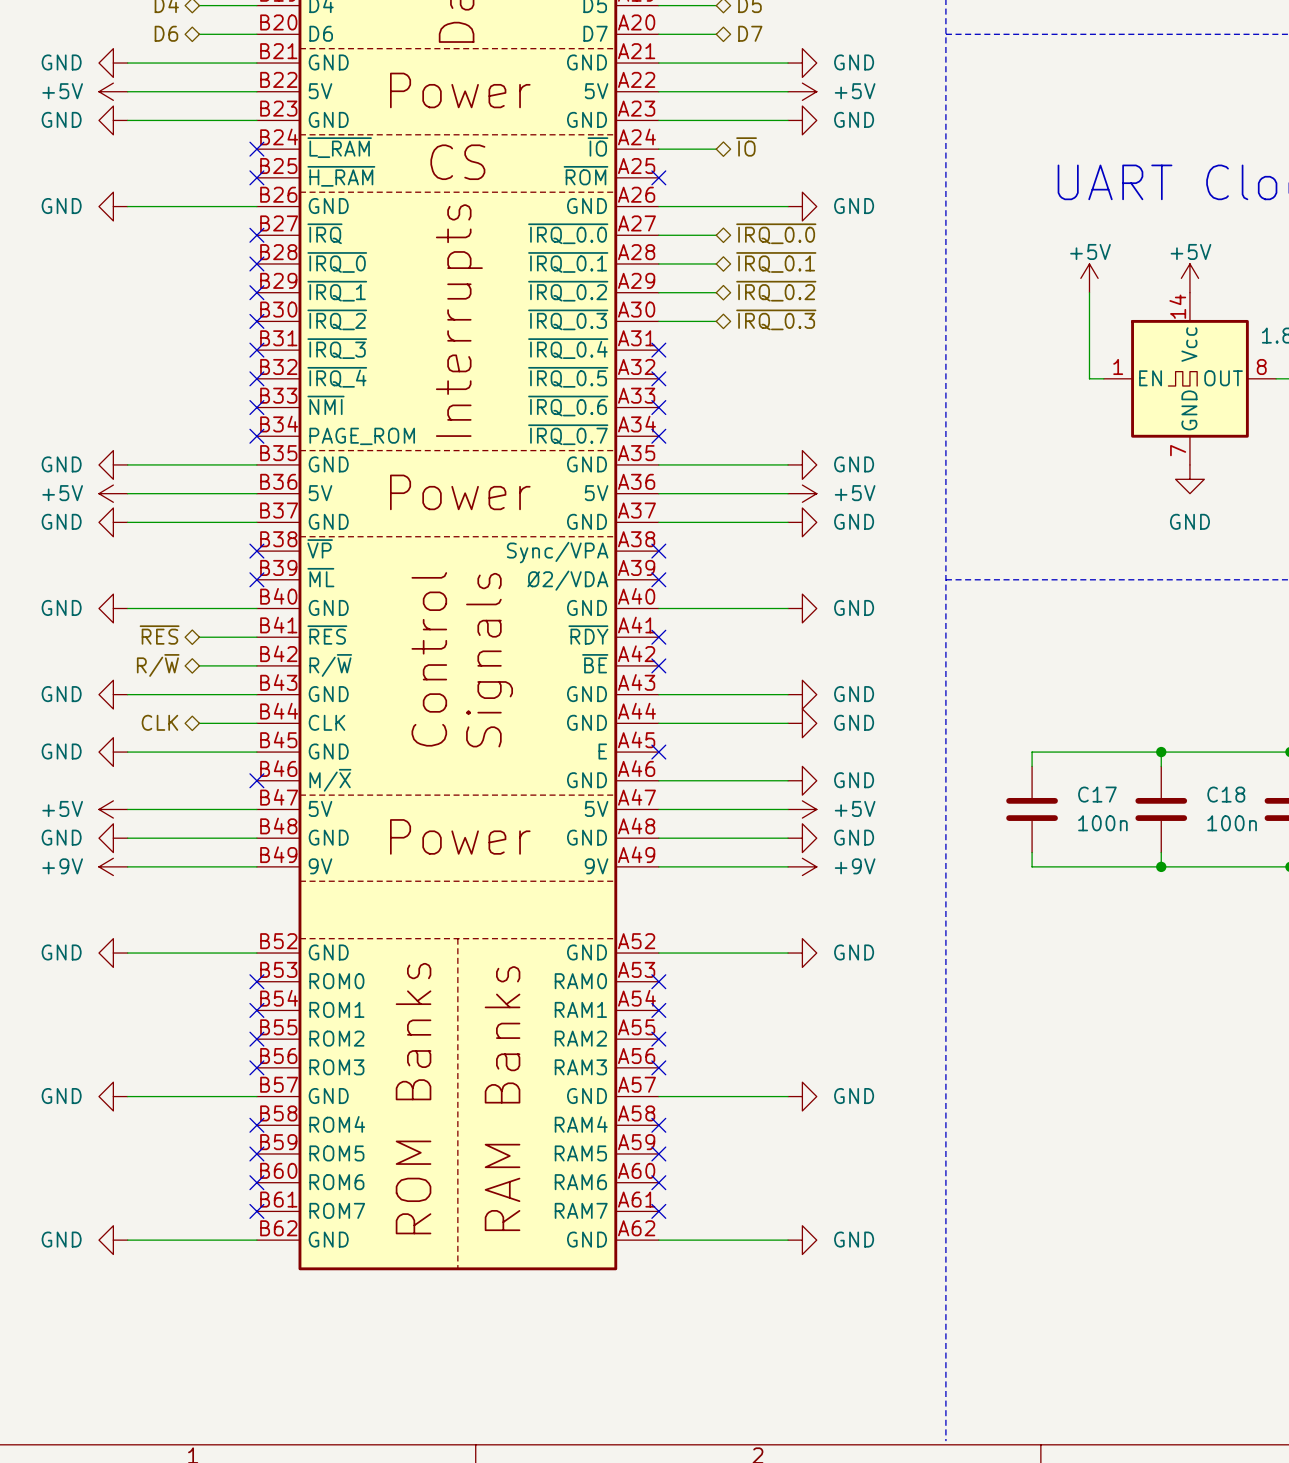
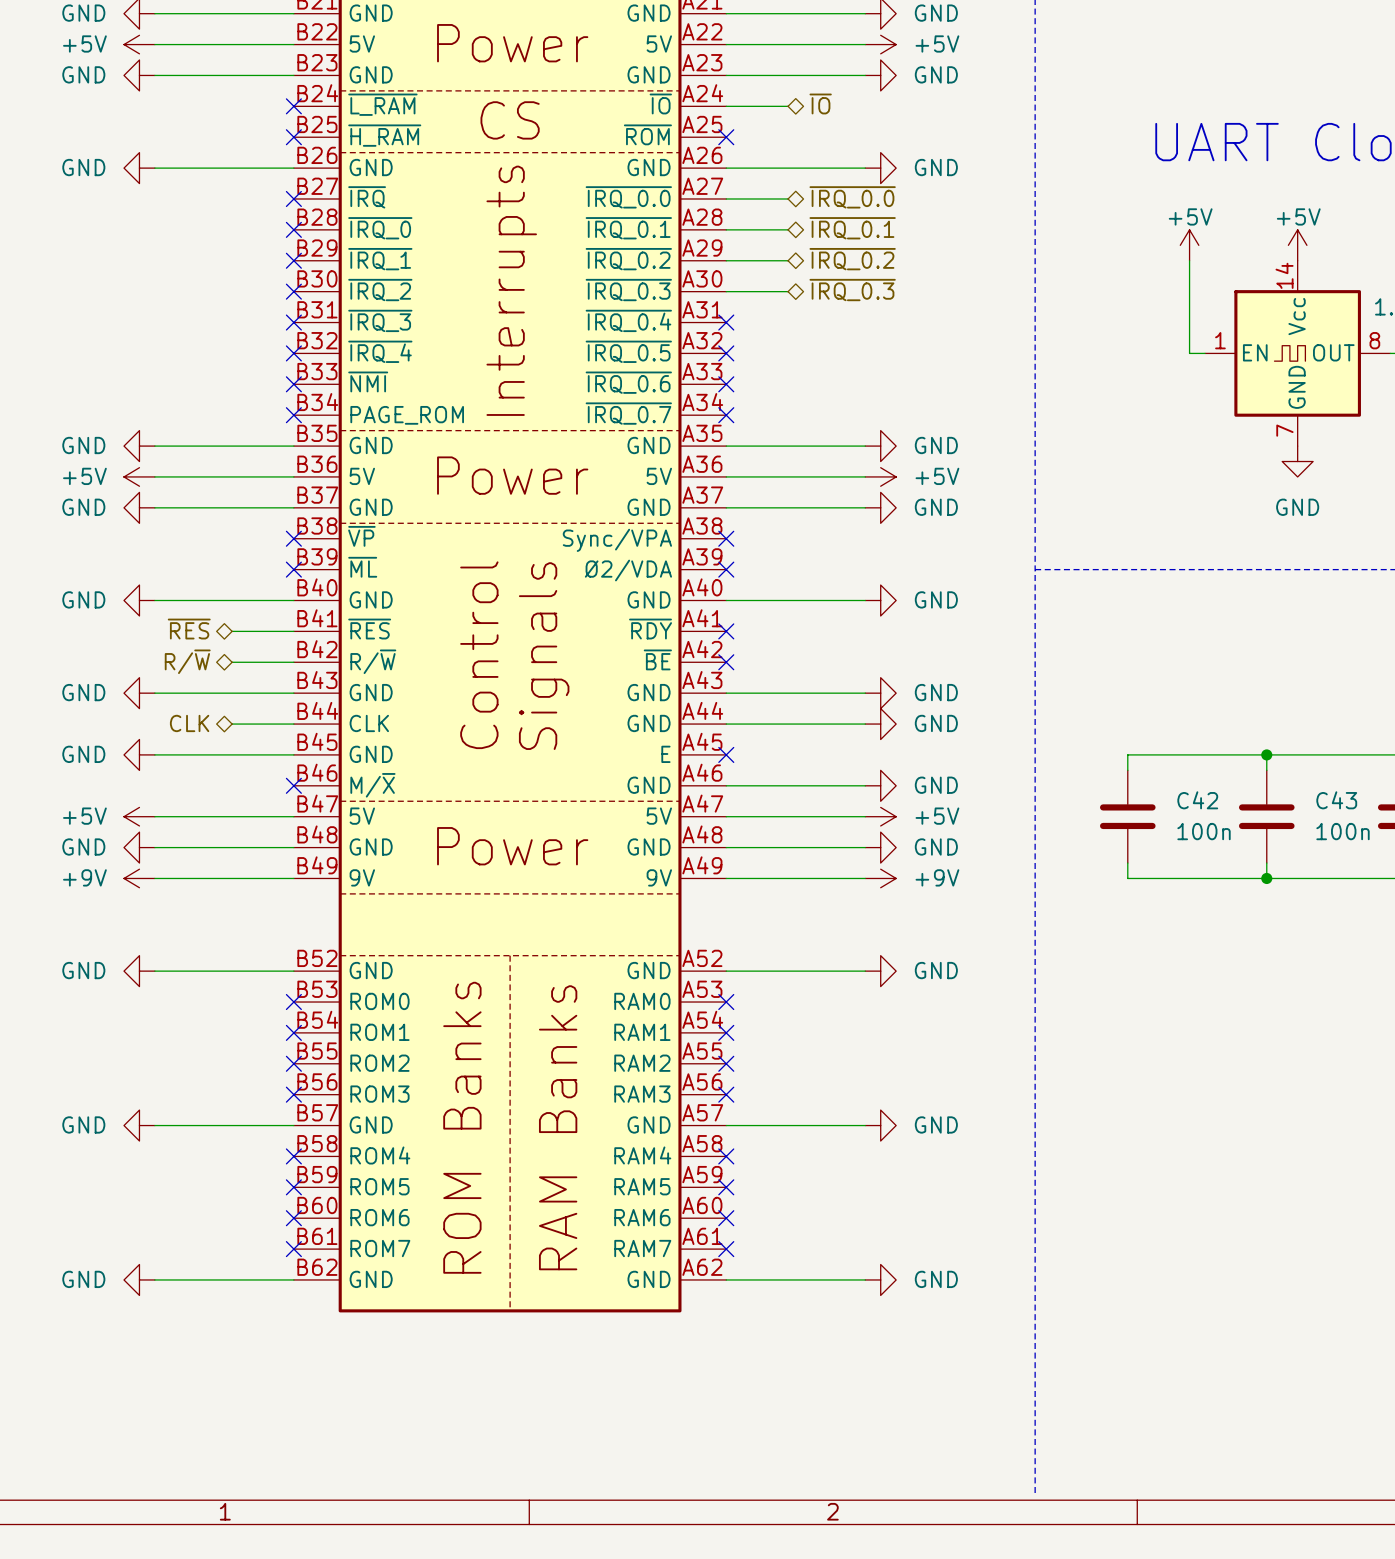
C17 name: C17 (1097, 794) -> C42 (1197, 800)
C18 name: C18 (1226, 794) -> C43 (1336, 800)

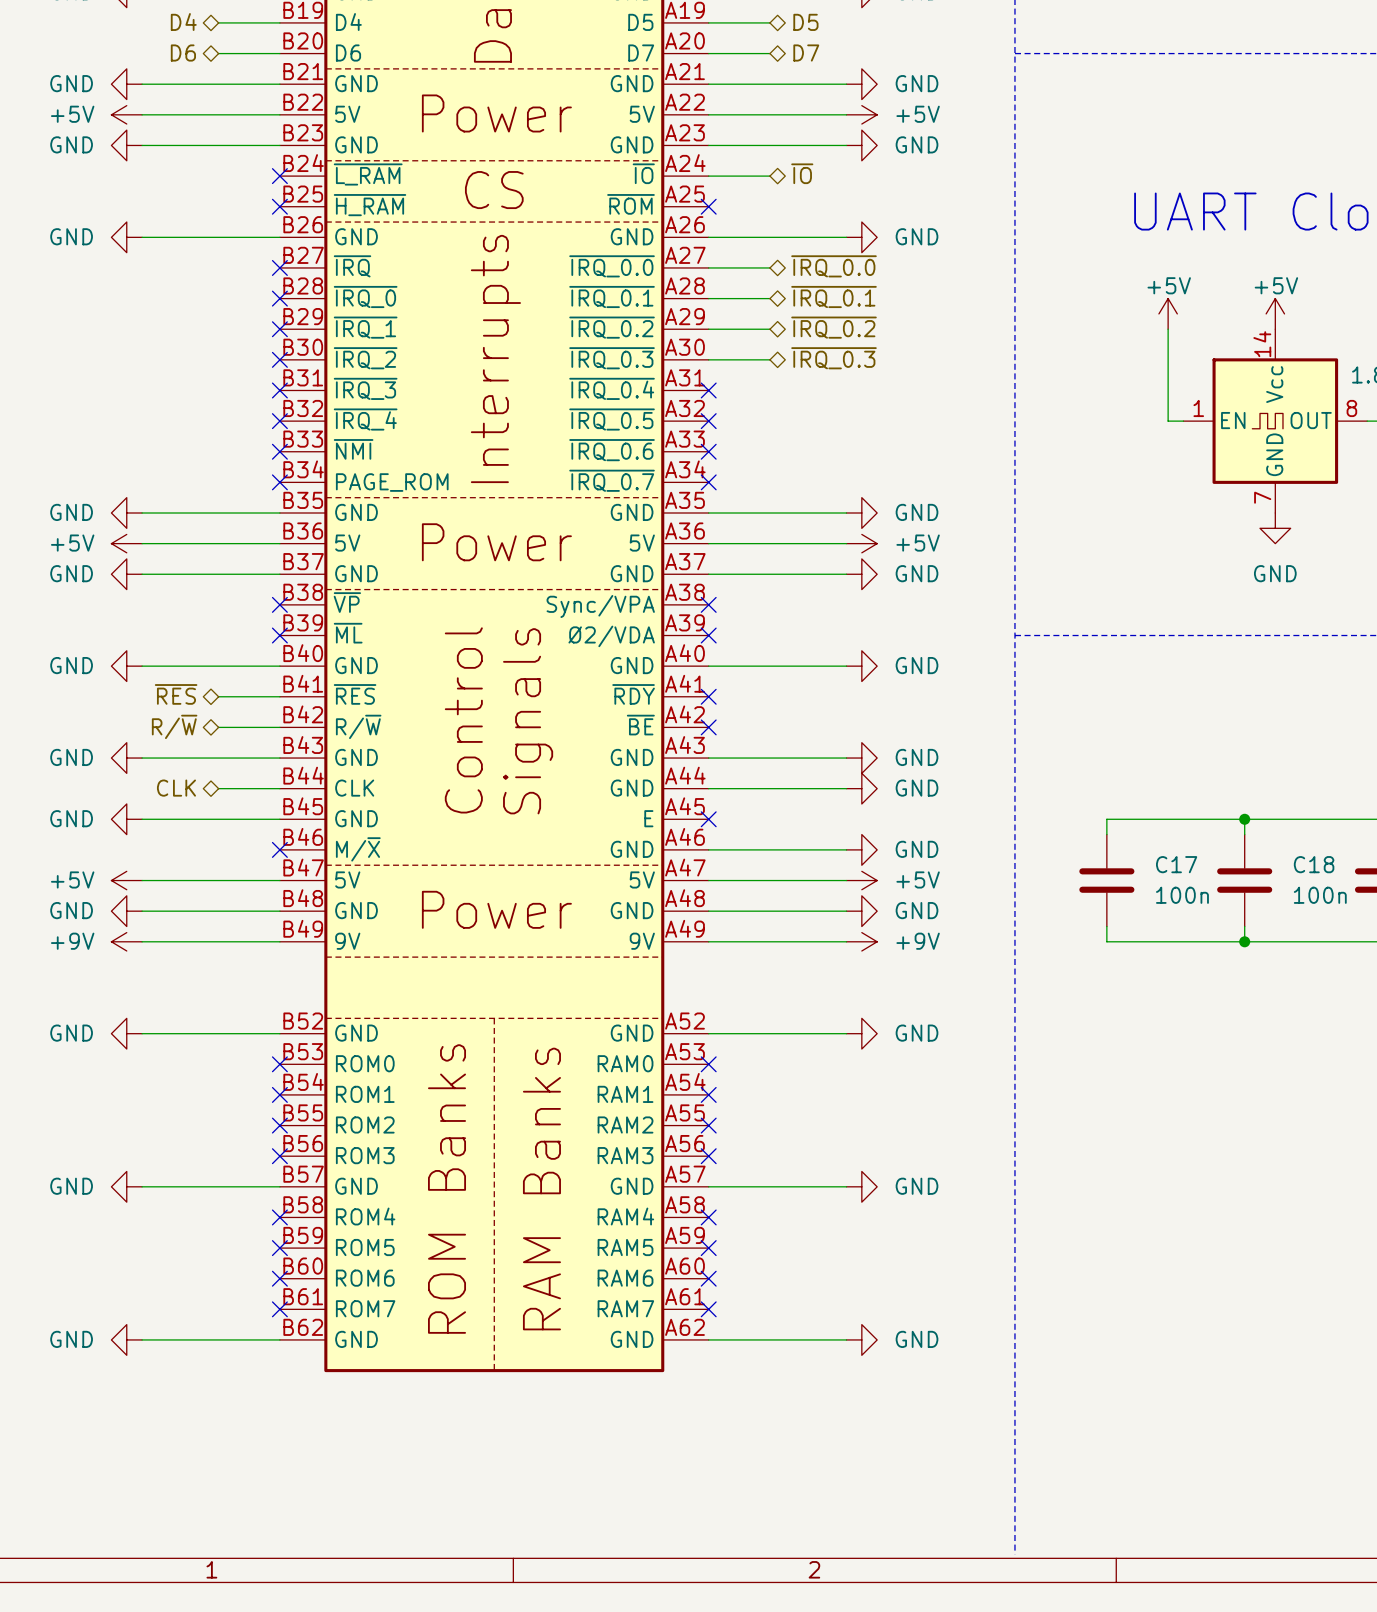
C42 name: C42 (1197, 800) -> C17 (1176, 864)
C43 name: C43 (1336, 800) -> C18 (1314, 864)

